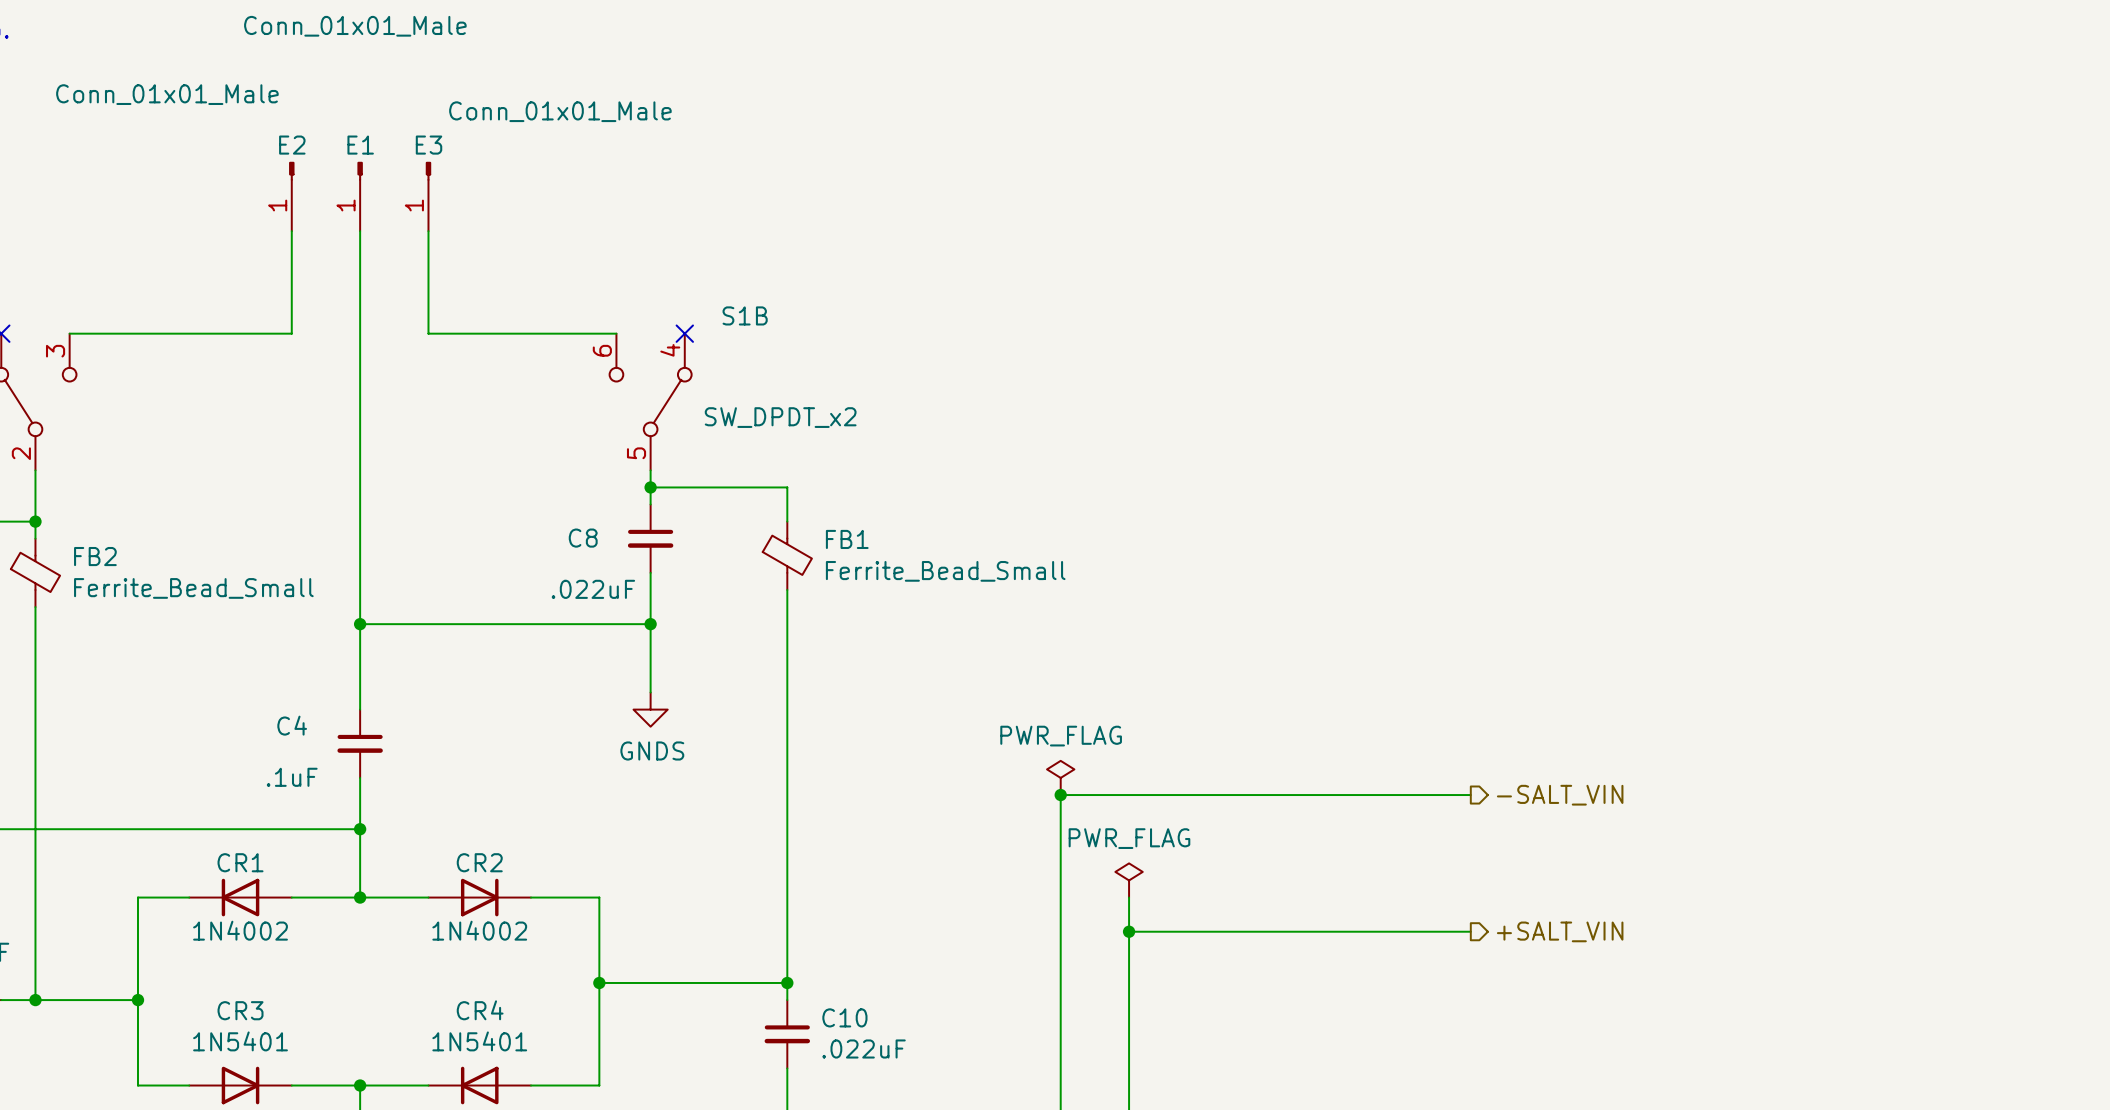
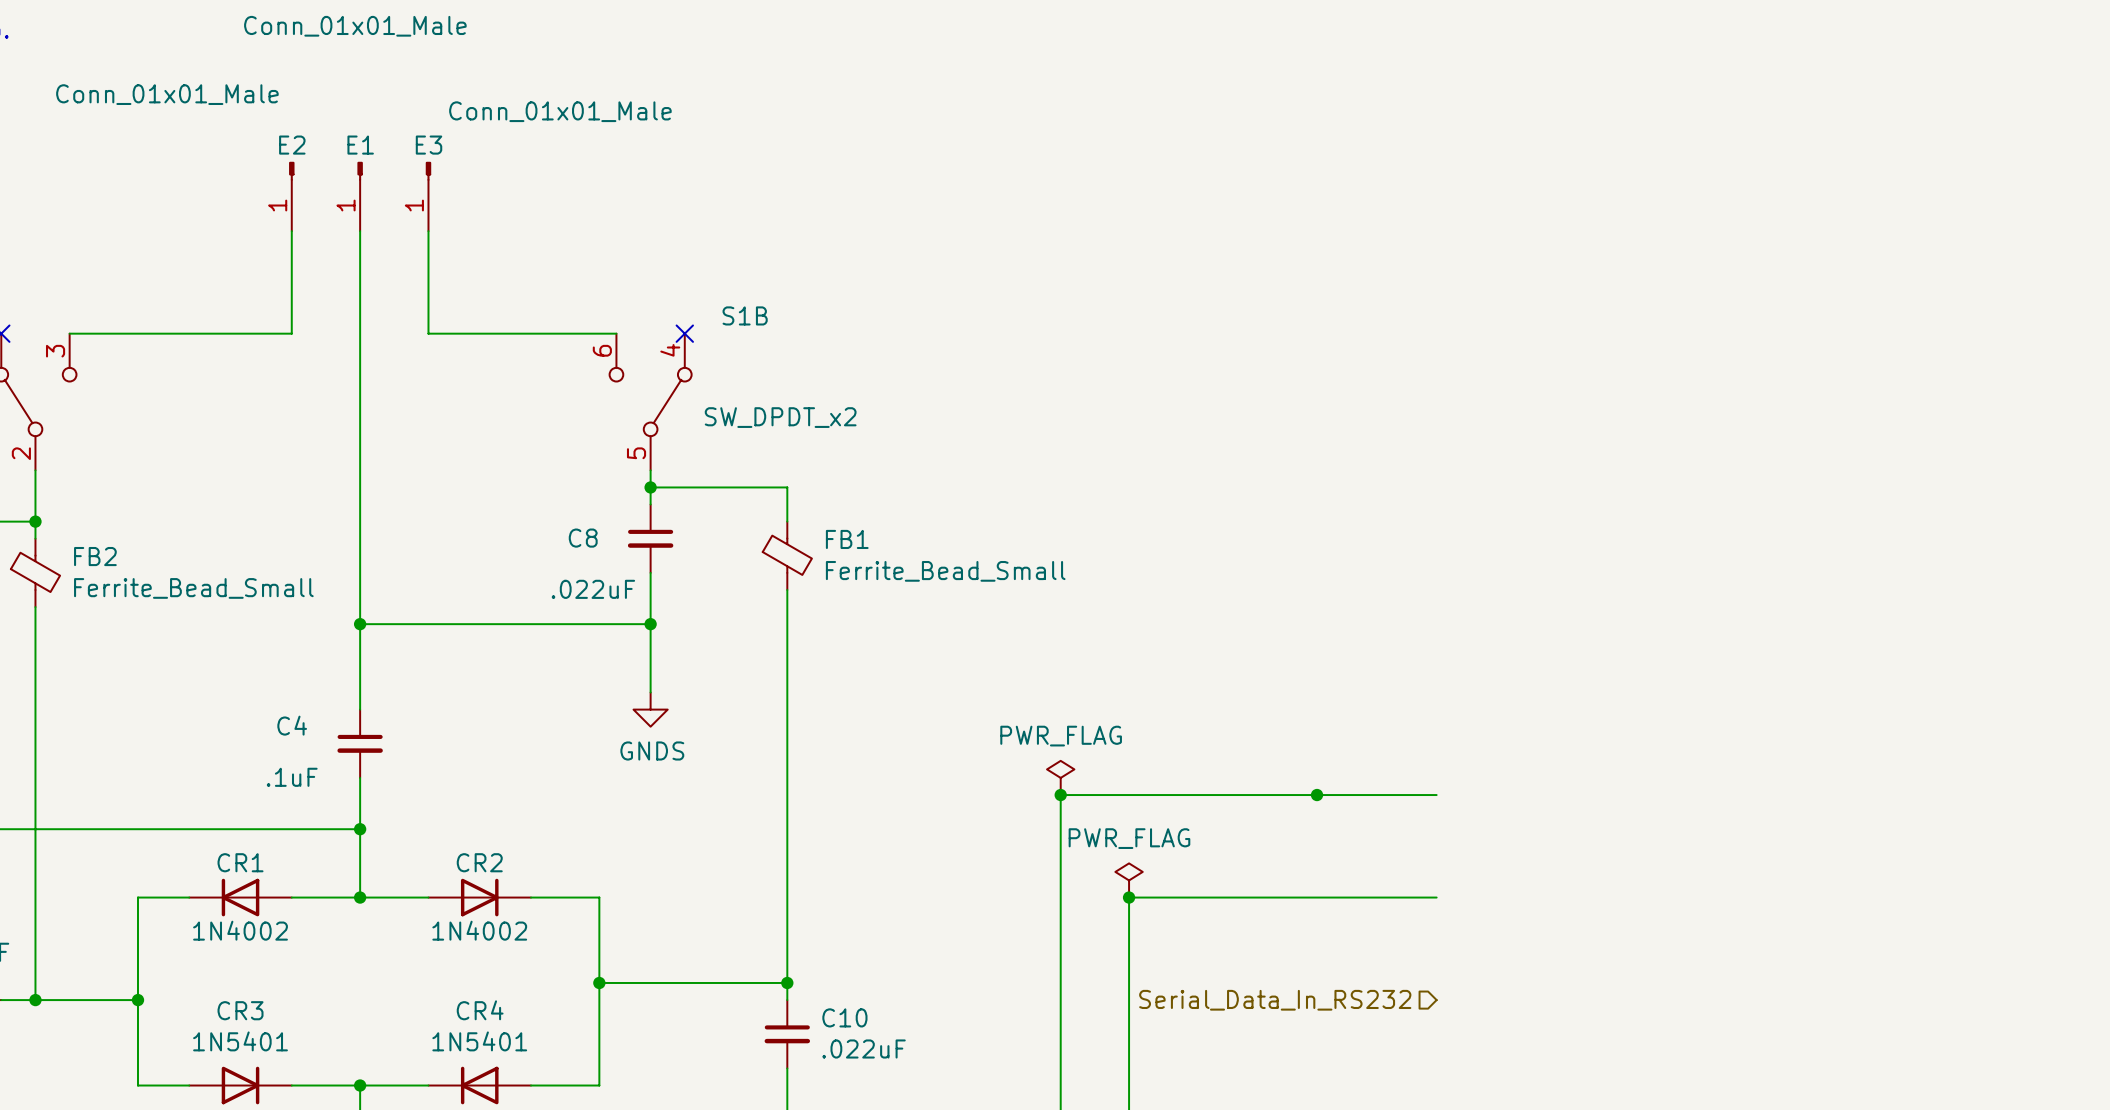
junction: none -> (1317, 795)
wire: (1436, 795) (1470, 795) -> none
hierarchical label: -SALT_VIN (1560, 795) -> none
wire: none -> (1129, 897) (1436, 897)
wire: (1129, 931) (1470, 931) -> none
junction position: (1129, 931) -> (1129, 897)
hierarchical label: +SALT_VIN (1560, 931) -> none
hierarchical label: none -> Serial_Data_In_RS232 (1275, 1000)

